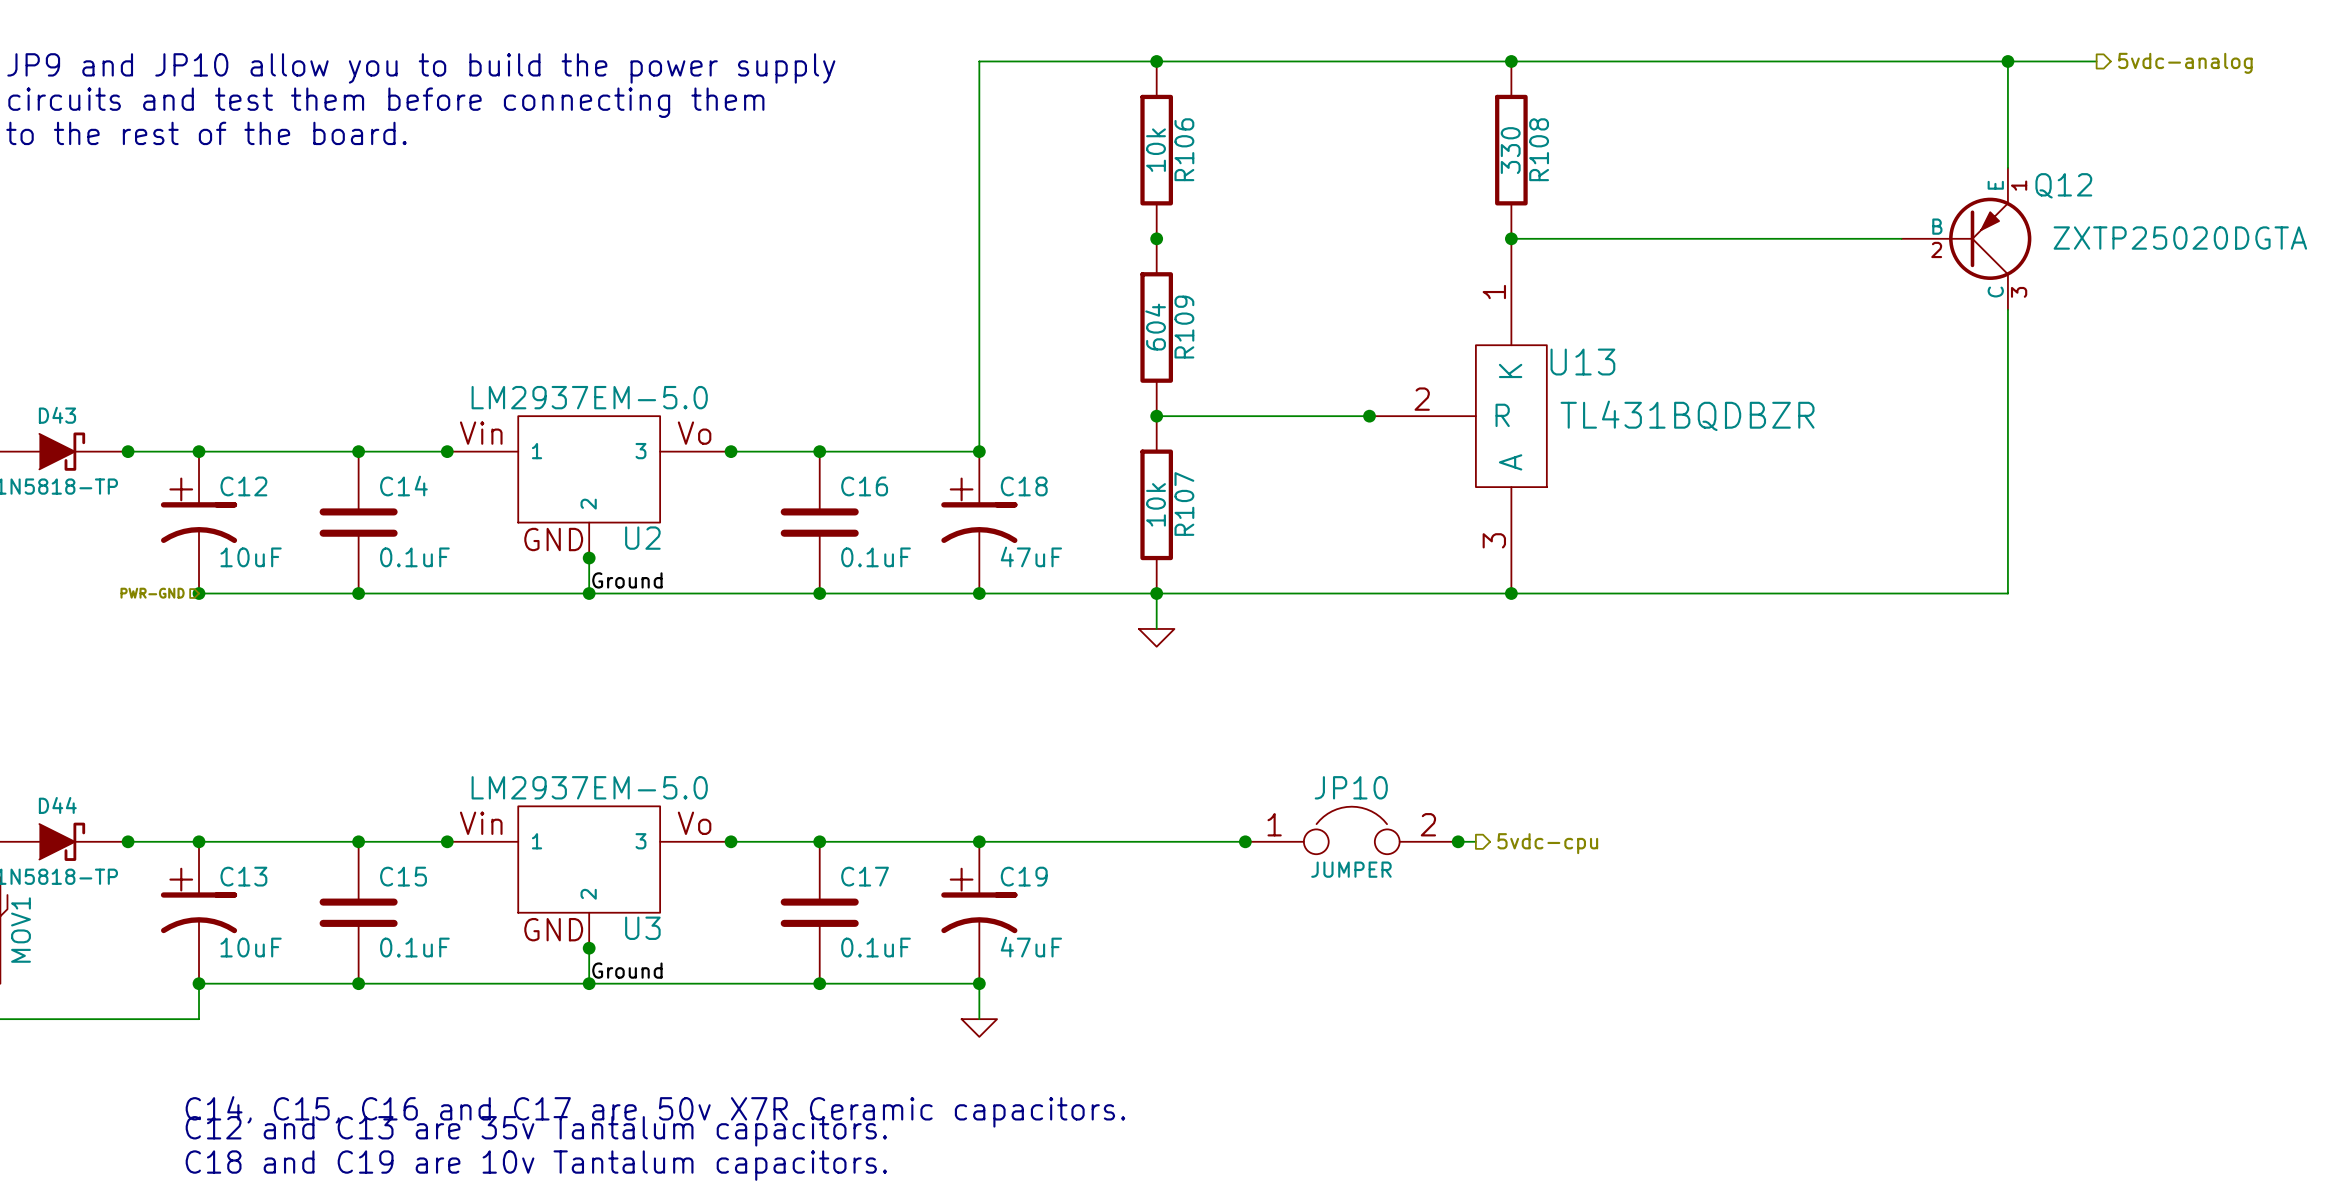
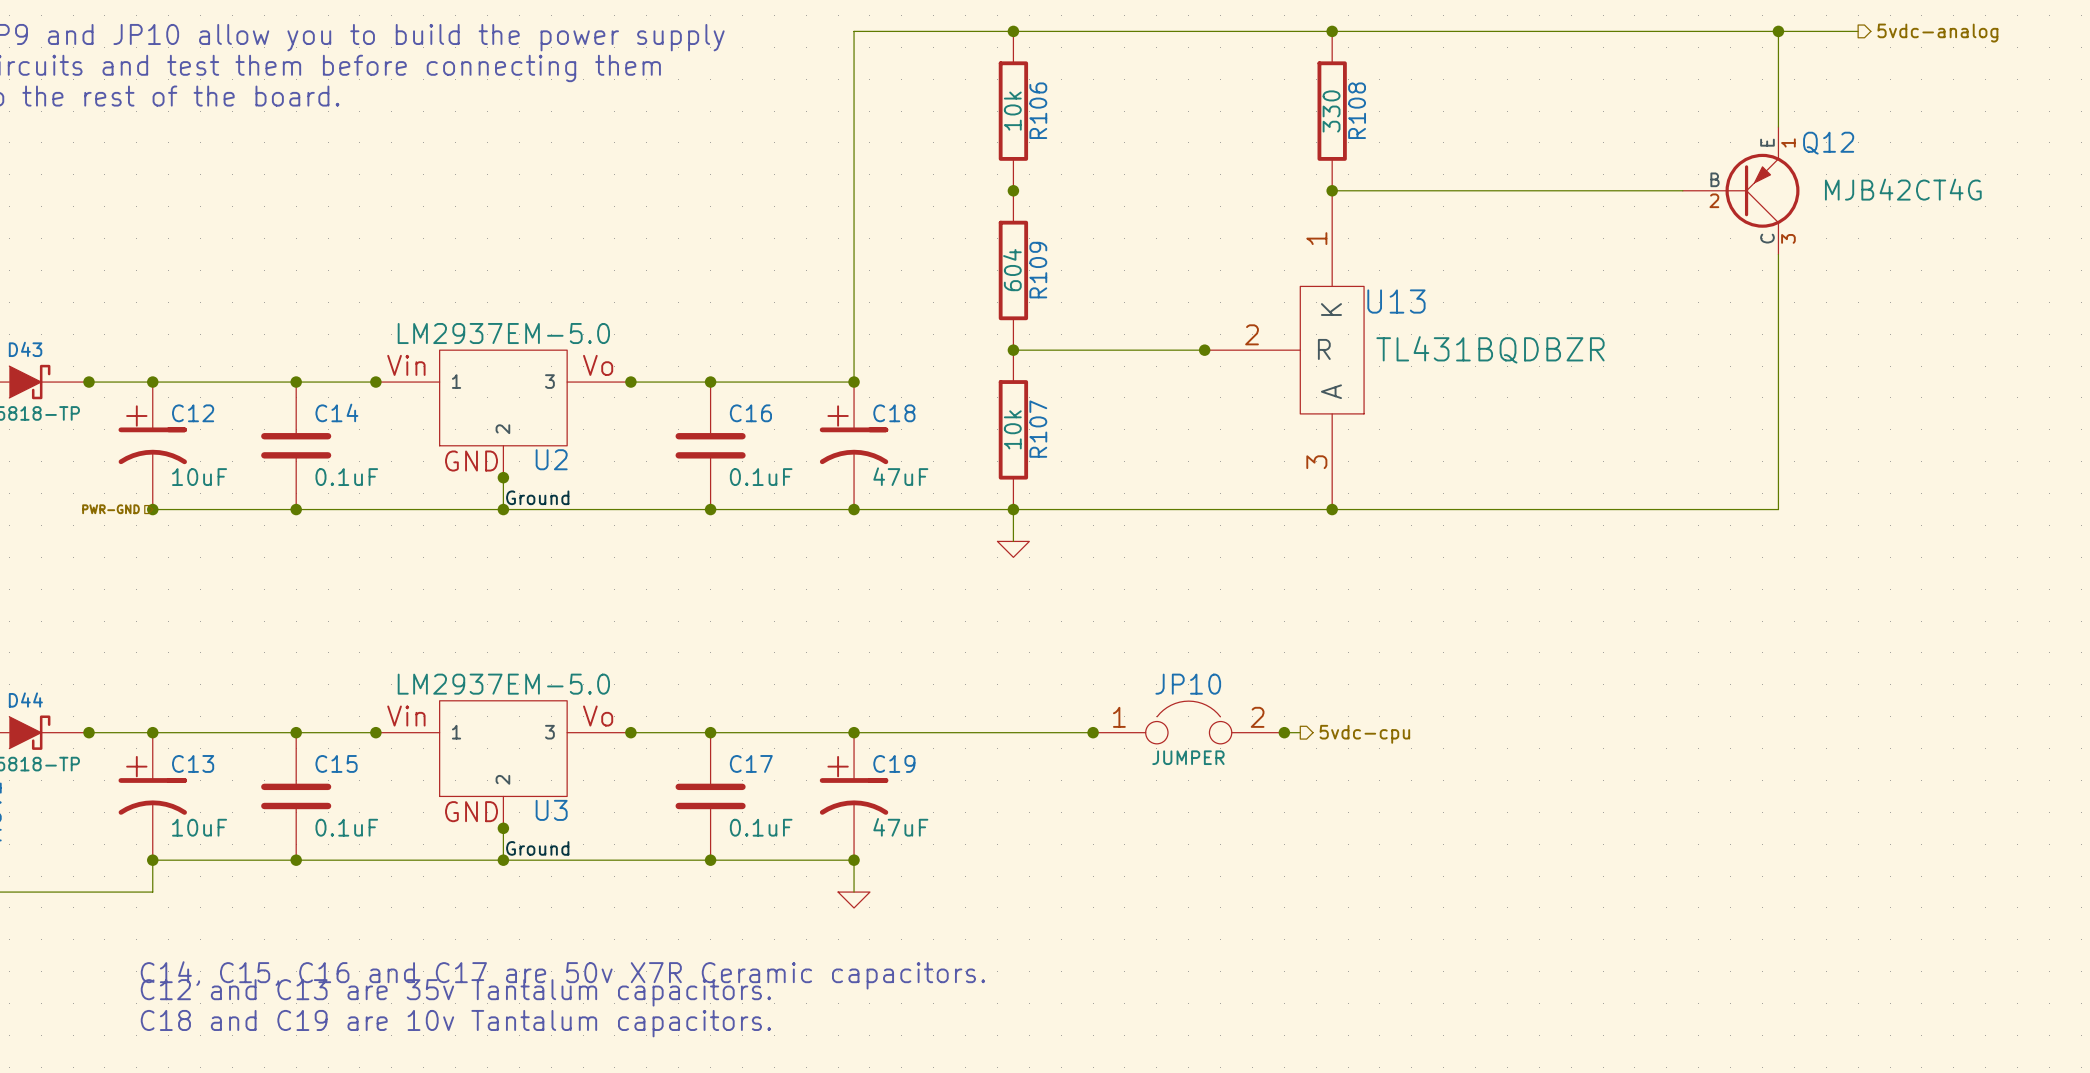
Q12 value: ZXTP25020DGTA (2180, 238) -> MJB42CT4G (1903, 189)

